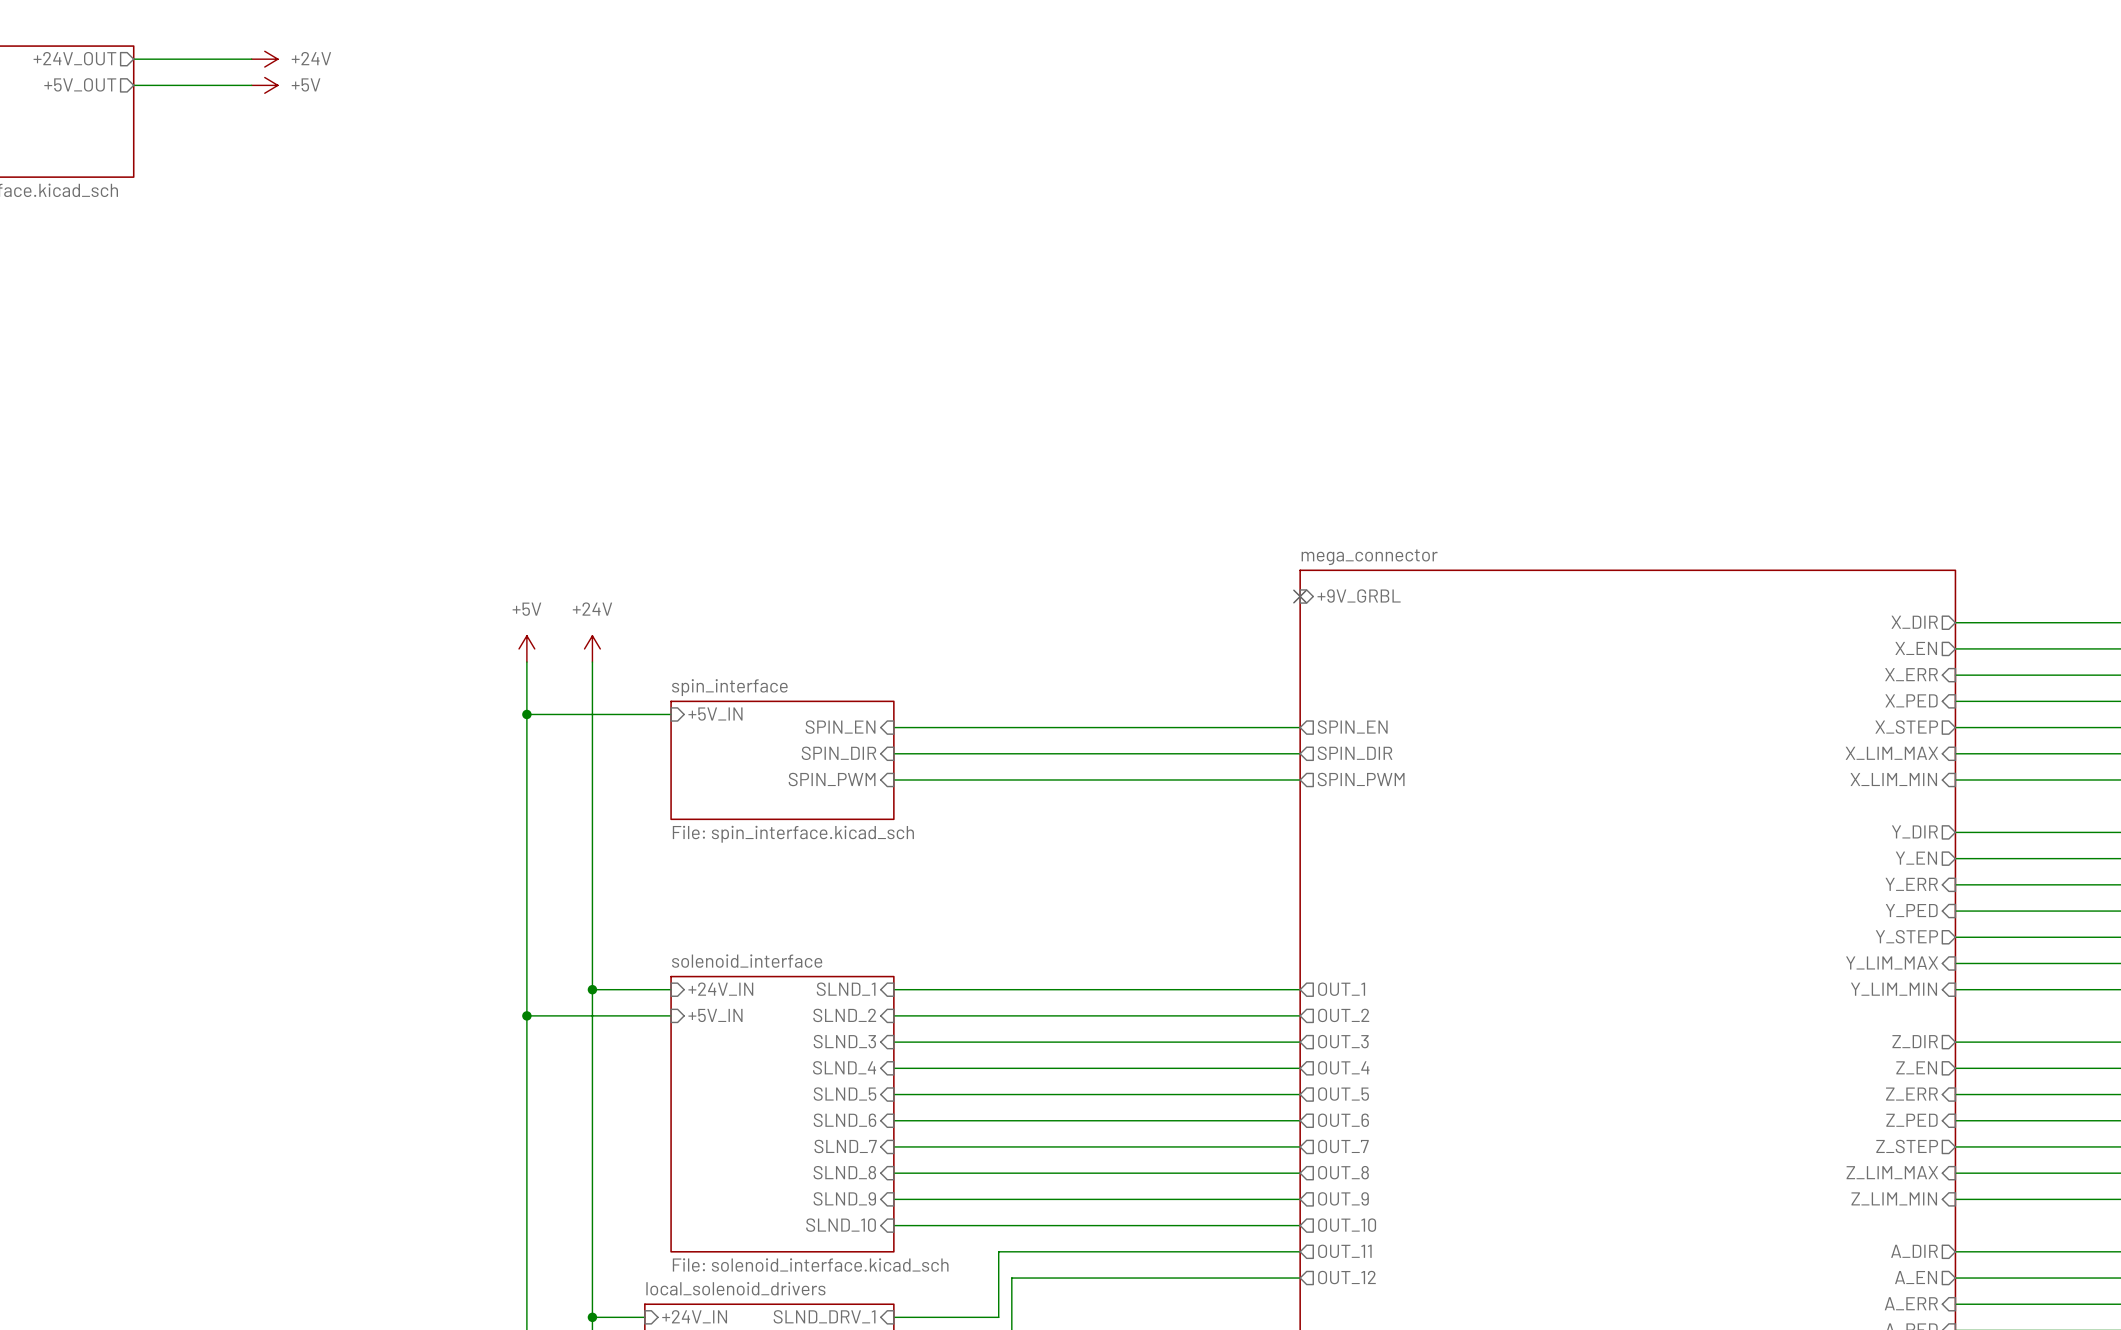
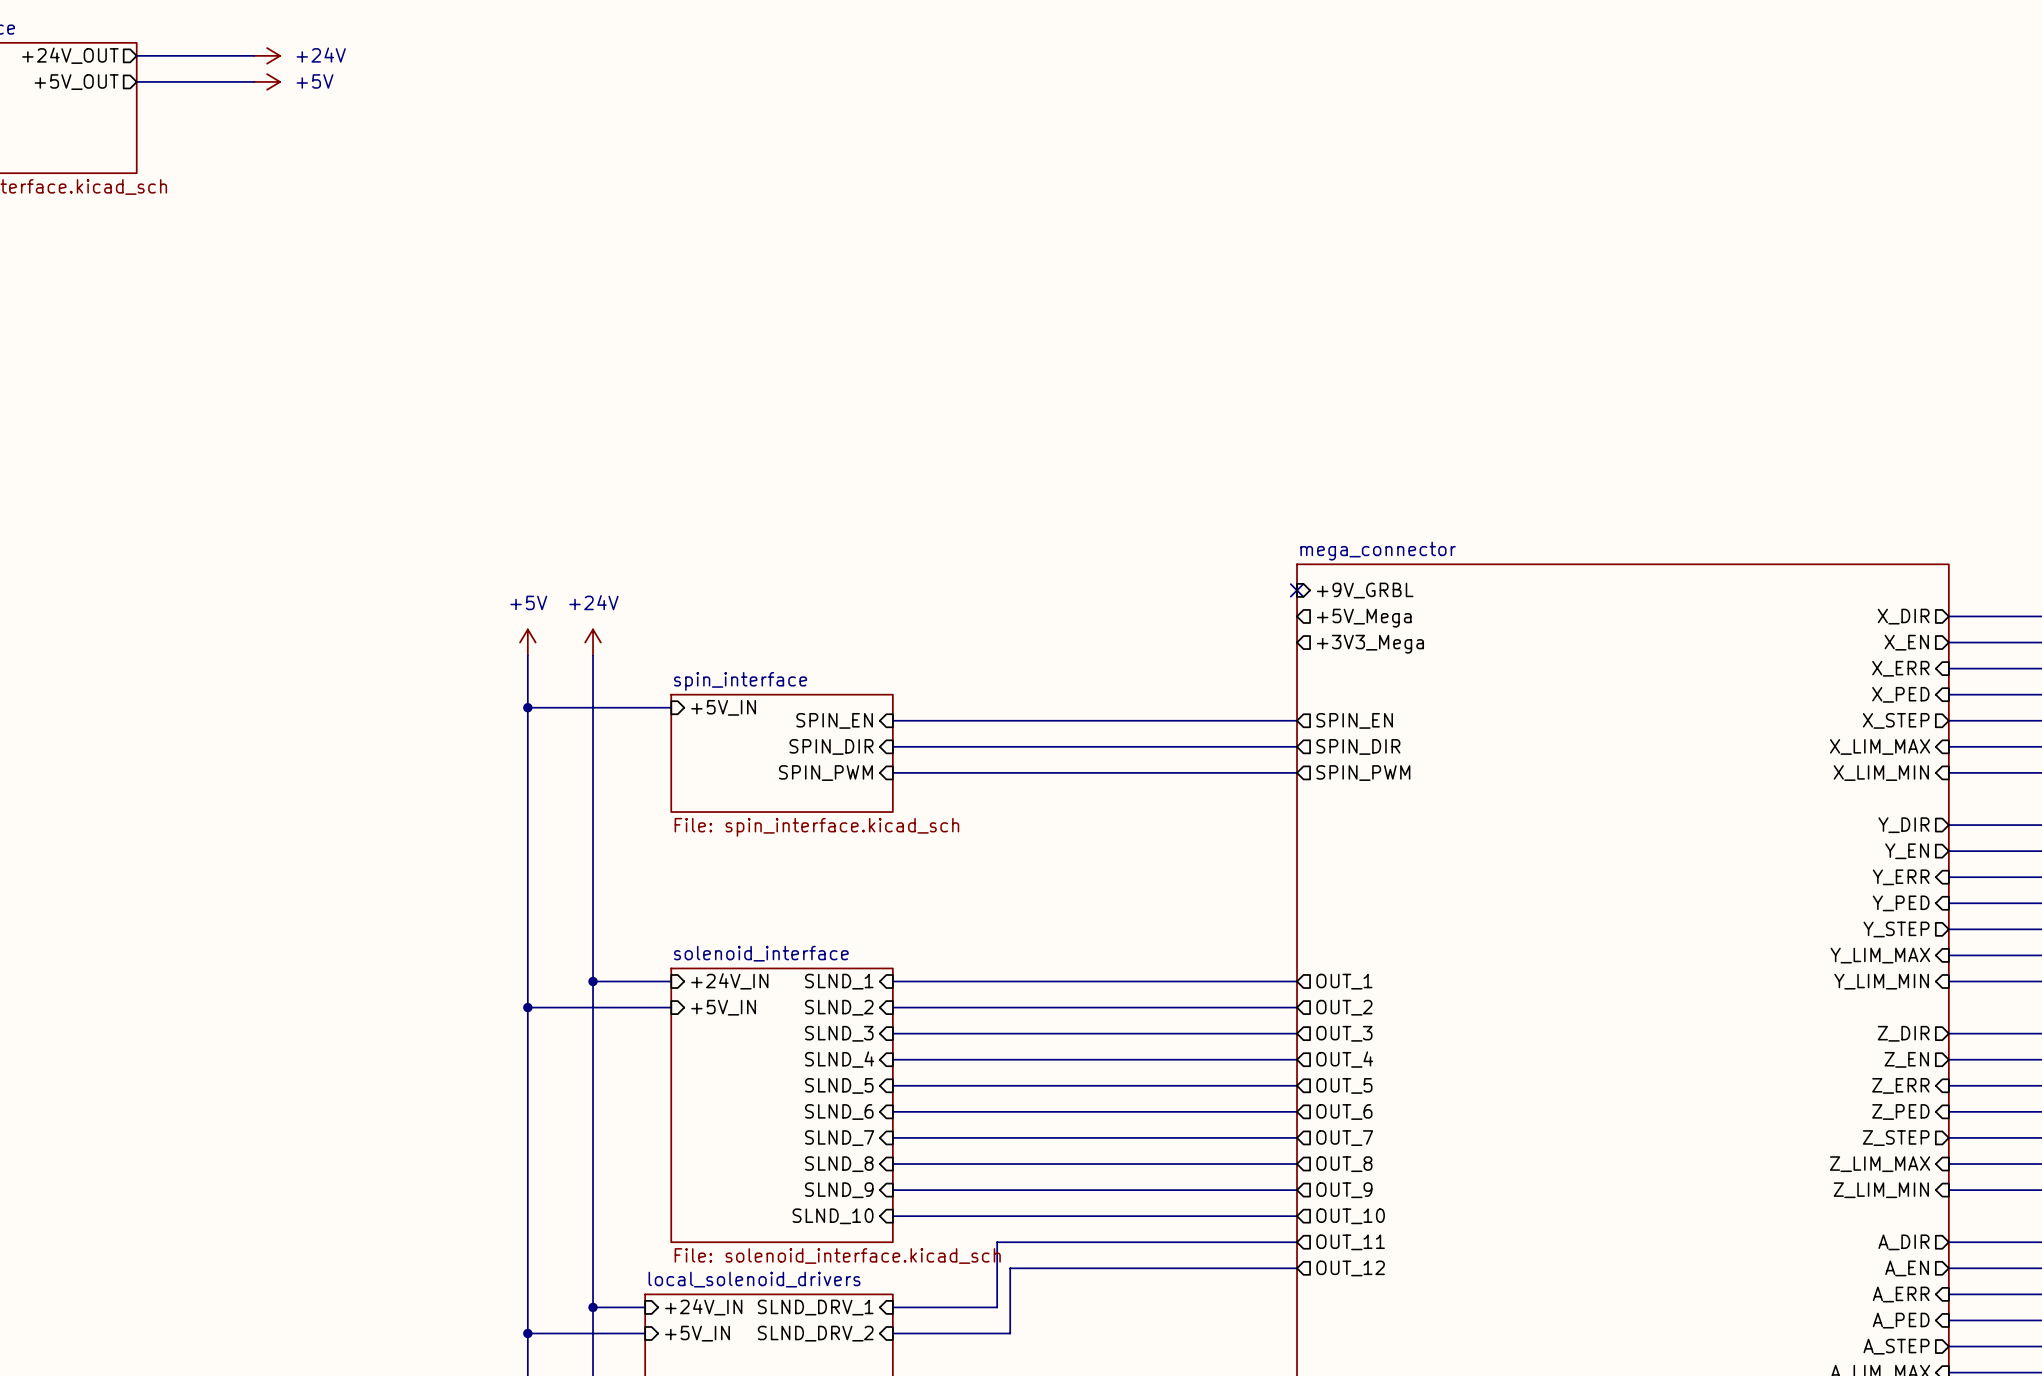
sheet pin: none -> +5V_Mega (1364, 618)
sheet pin: none -> +3V3_Mega (1370, 644)

